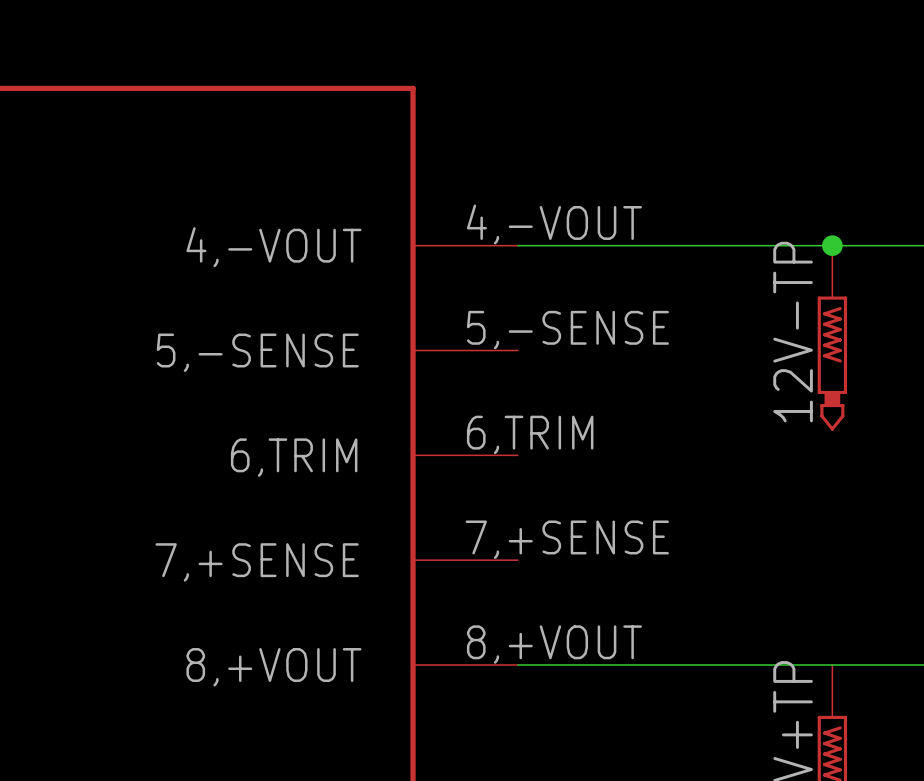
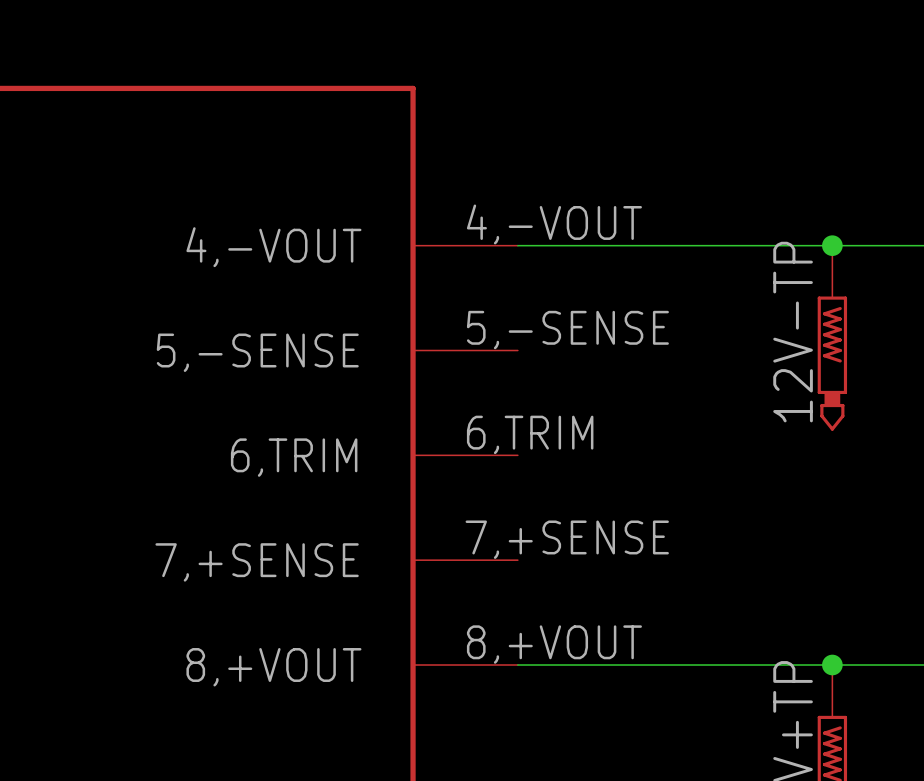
junction: none -> (832, 665)

